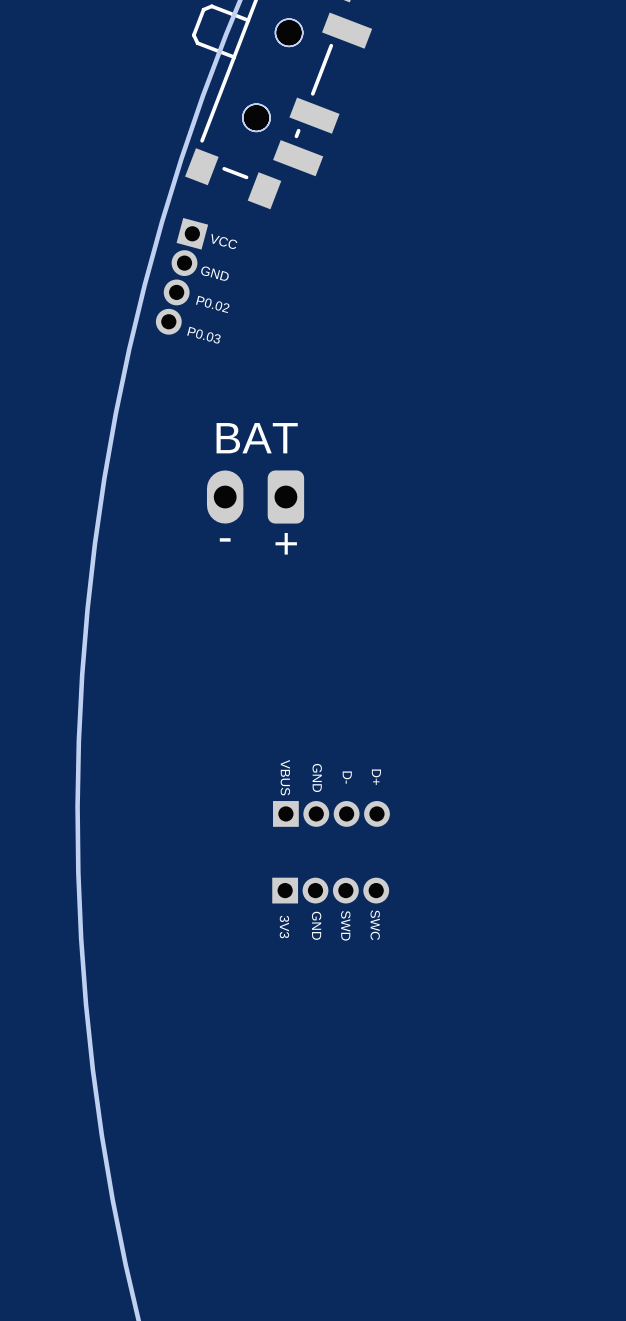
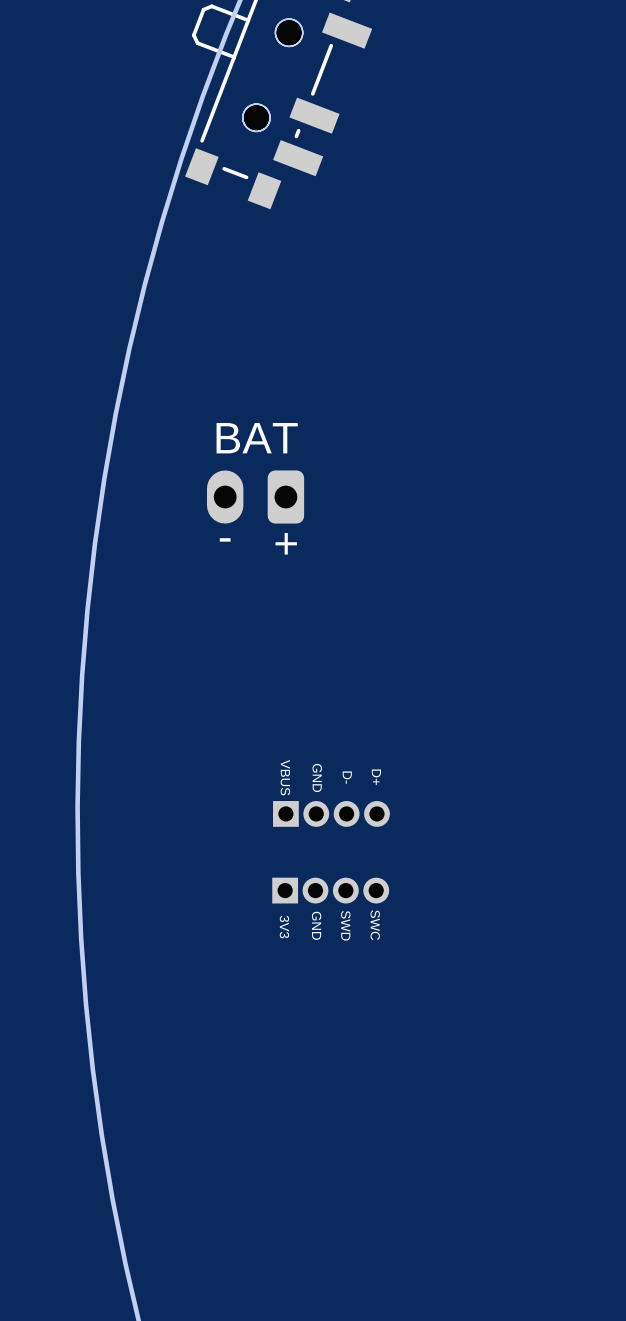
text: VCC (224, 241) -> none
text: GND (215, 273) -> none
part: (182, 276) -> none
text: P0.02 (212, 304) -> none
text: P0.03 (204, 335) -> none

